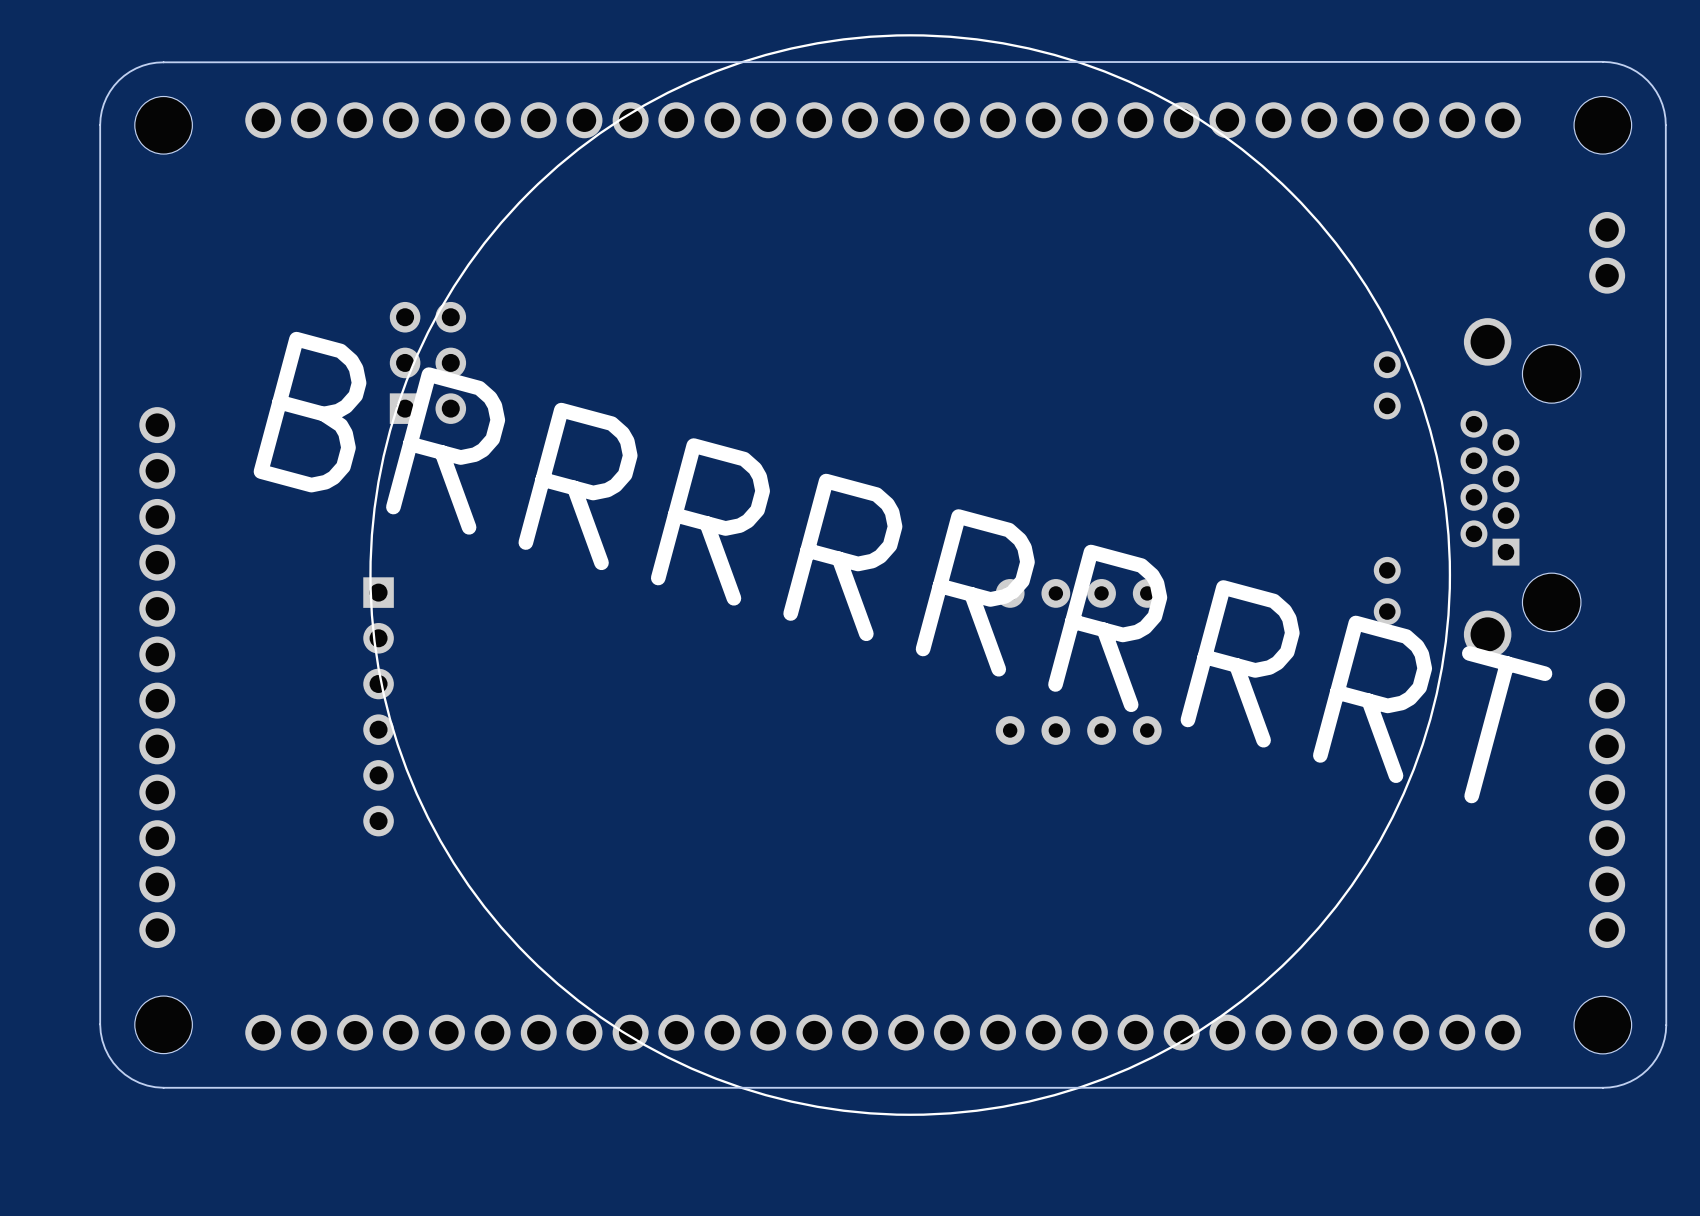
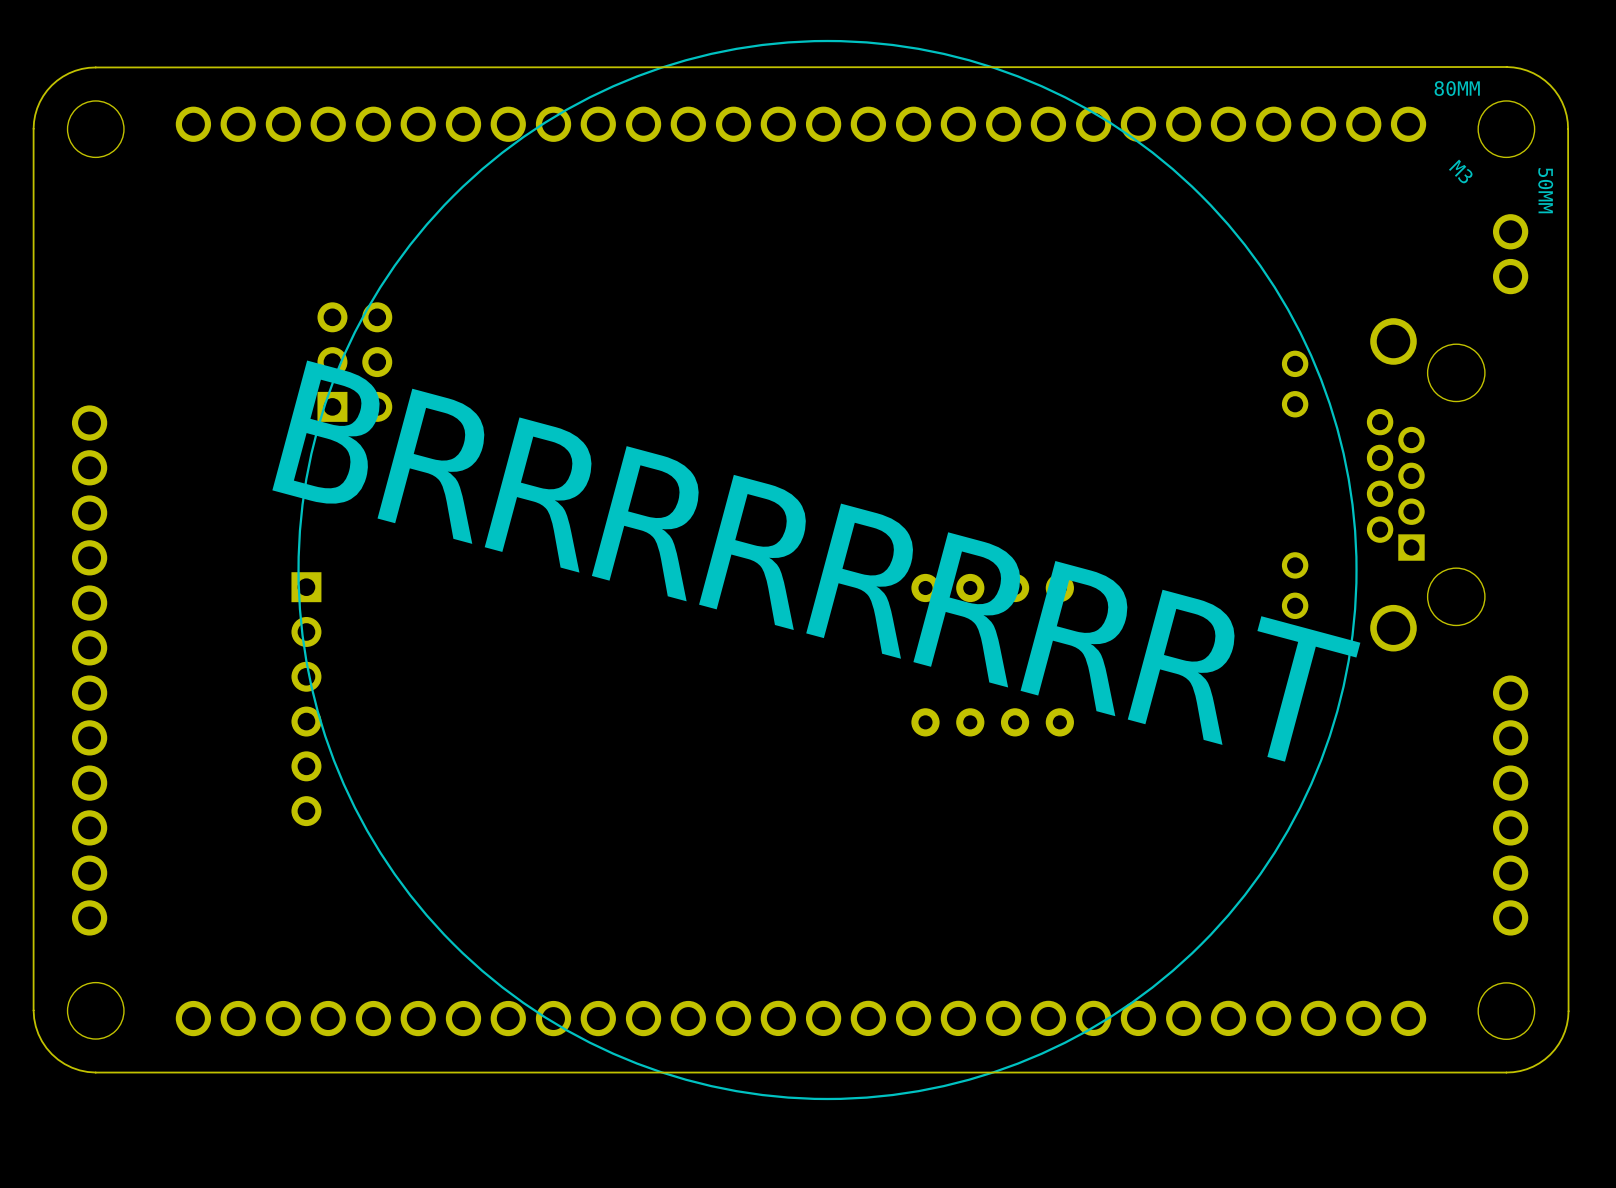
text: none -> 80MM (1457, 88)
text: none -> M3 (1460, 171)
text: none -> 50MM (1545, 190)

